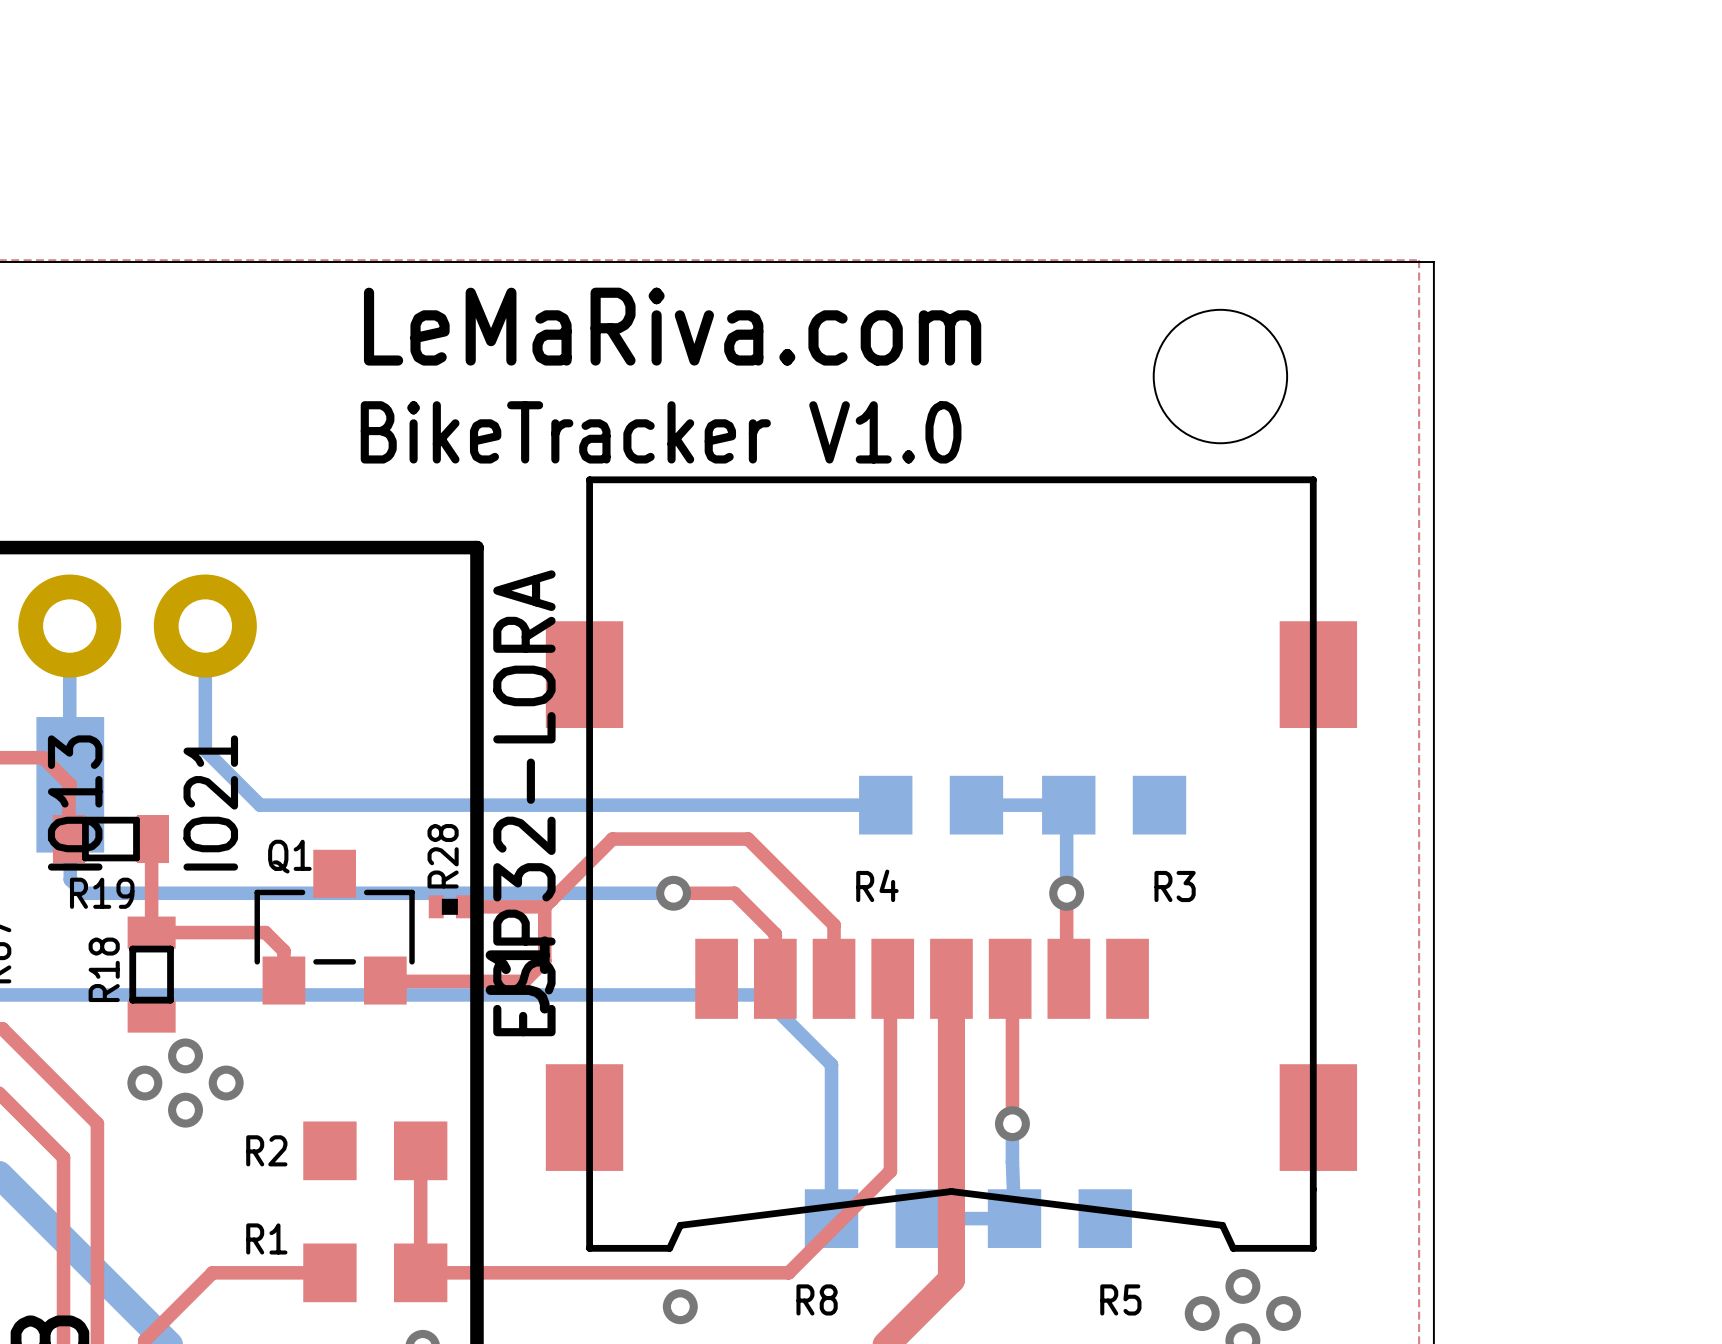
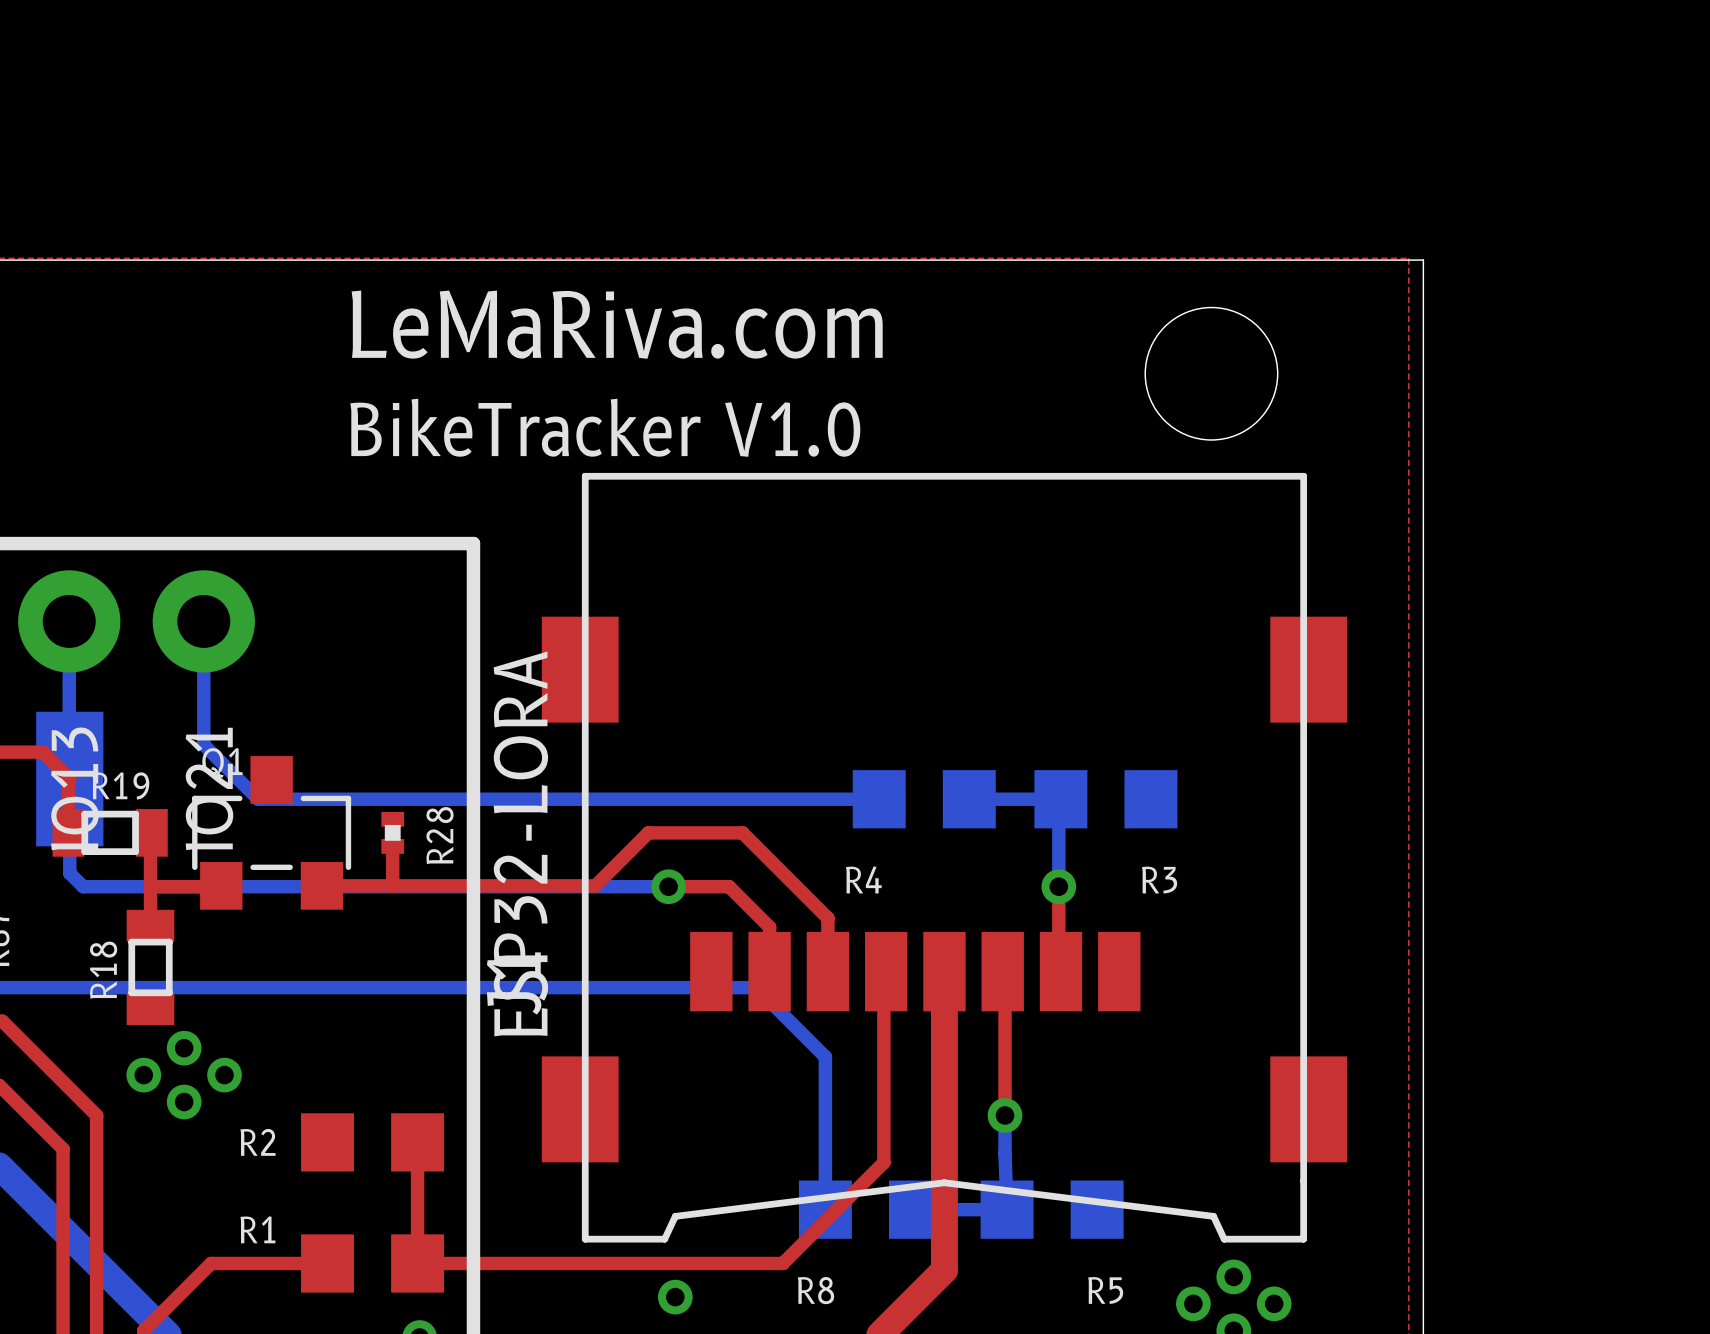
top track: (653, 839) (612, 839) (544, 906) -> (648, 832) (595, 885) (321, 885)
top track: none -> (392, 846) (392, 885)
top track: none -> (221, 885) (150, 886)
R19 name position: R19 (102, 893) -> R19 (120, 785)
R28 rotation: 0° (449, 906) -> 90° clockwise (392, 832)
R28 position: (449, 906) -> (392, 832)
top track: (463, 906) (544, 906) -> none
top track: (544, 906) (544, 961) (524, 981) (385, 980) -> none
Q1 position: (334, 927) -> (271, 832)
top track: (151, 932) (265, 932) (283, 951) (283, 980) -> none

